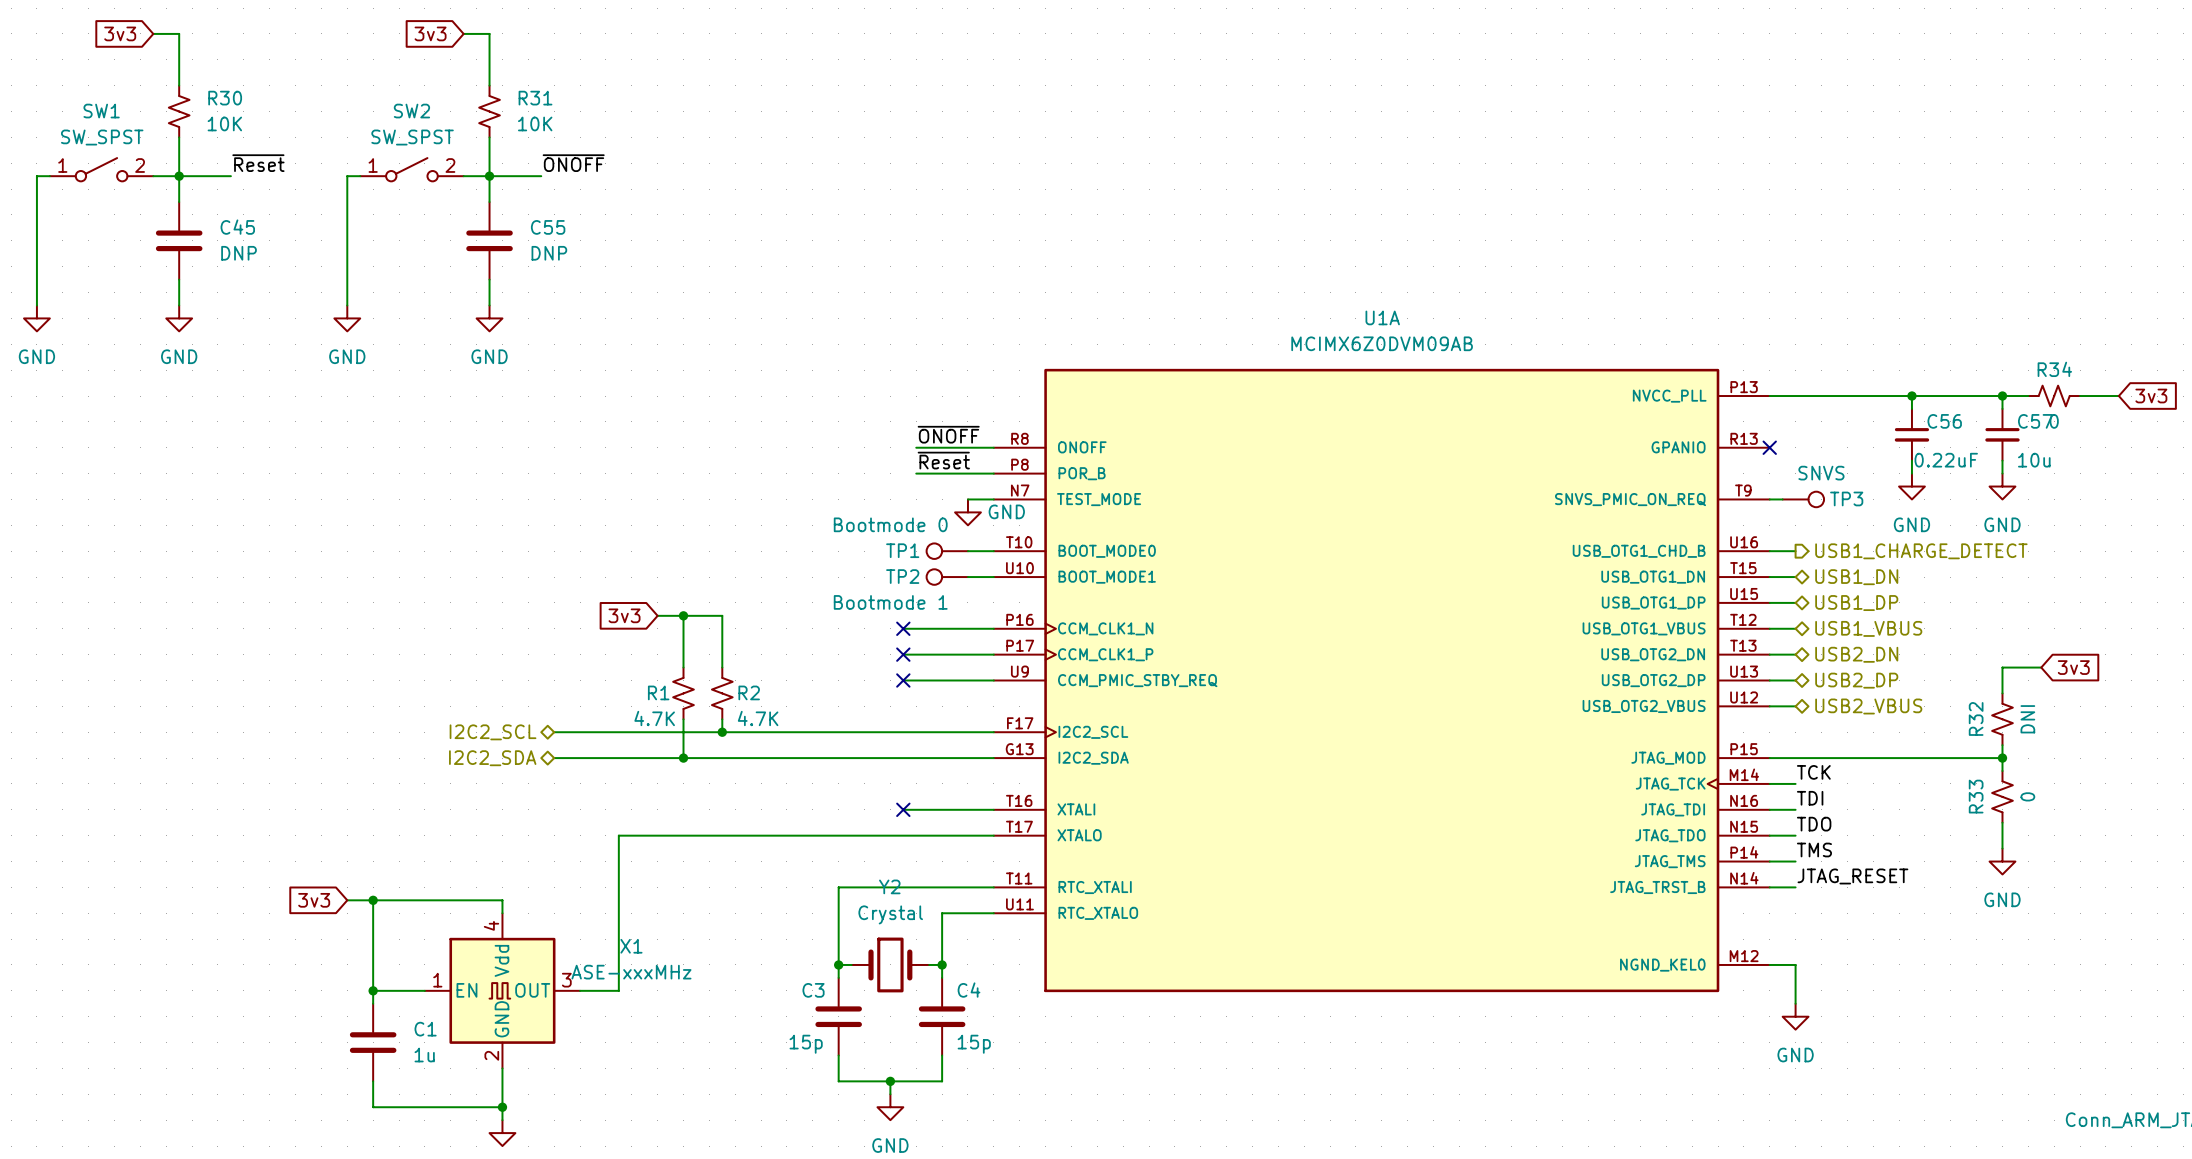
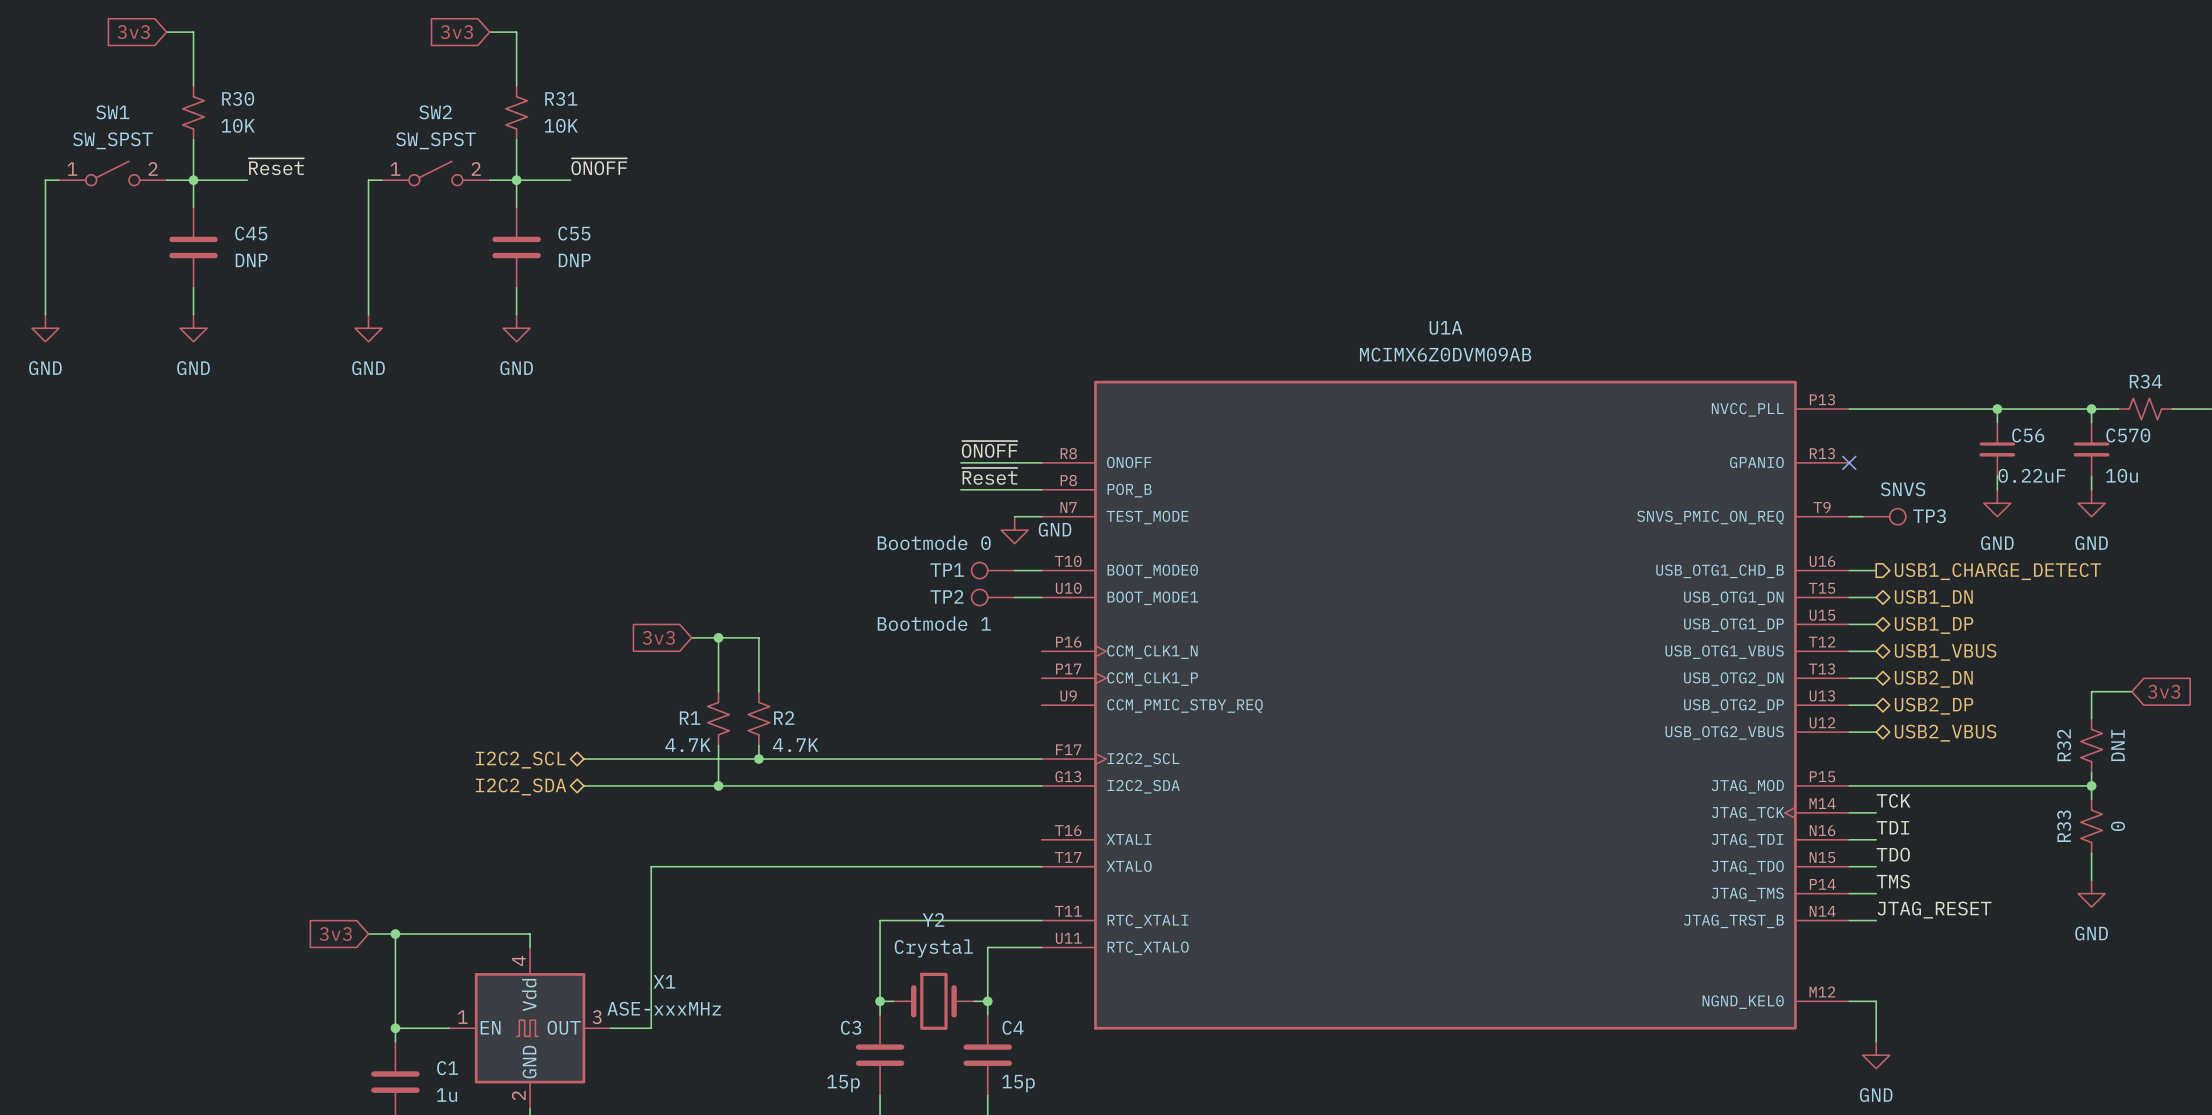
wire: (903, 628) (993, 628) -> none
no-connect mark: (903, 628) -> none
wire: (903, 654) (993, 654) -> none
no-connect mark: (903, 654) -> none
wire: (903, 680) (993, 680) -> none
no-connect mark: (903, 680) -> none
wire: (903, 809) (993, 809) -> none
no-connect mark: (903, 809) -> none

